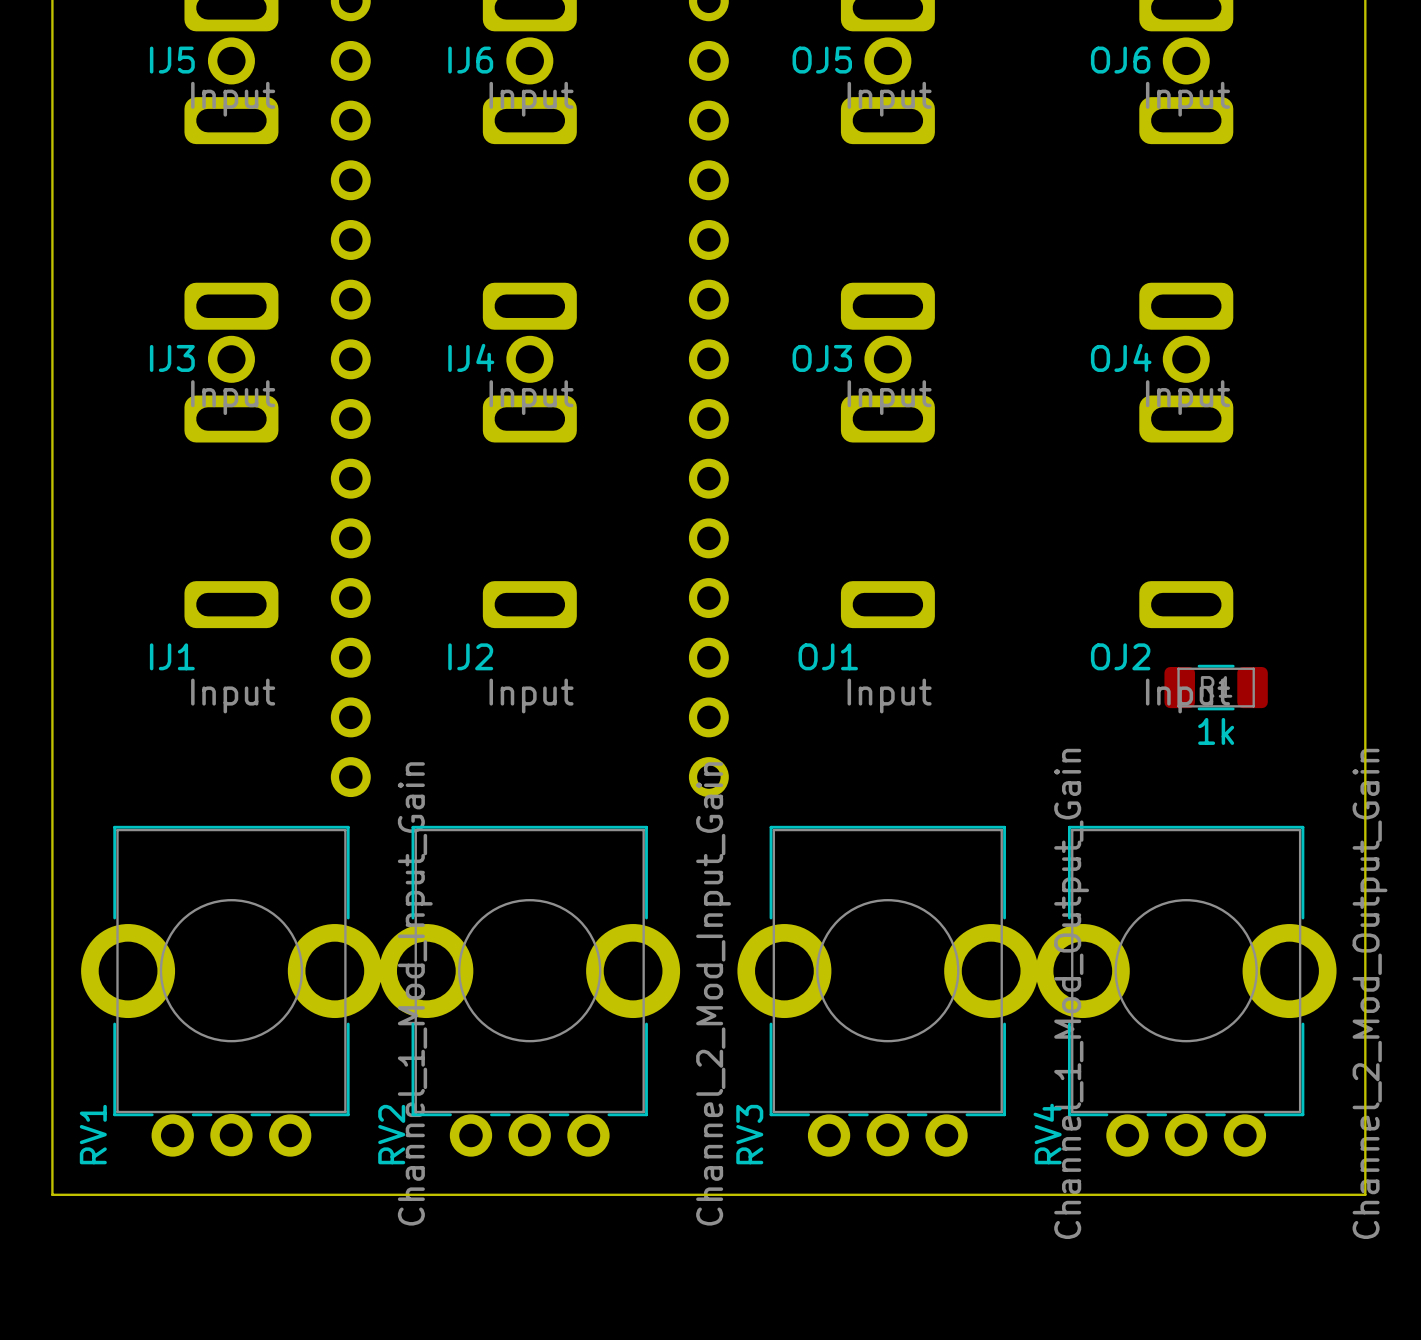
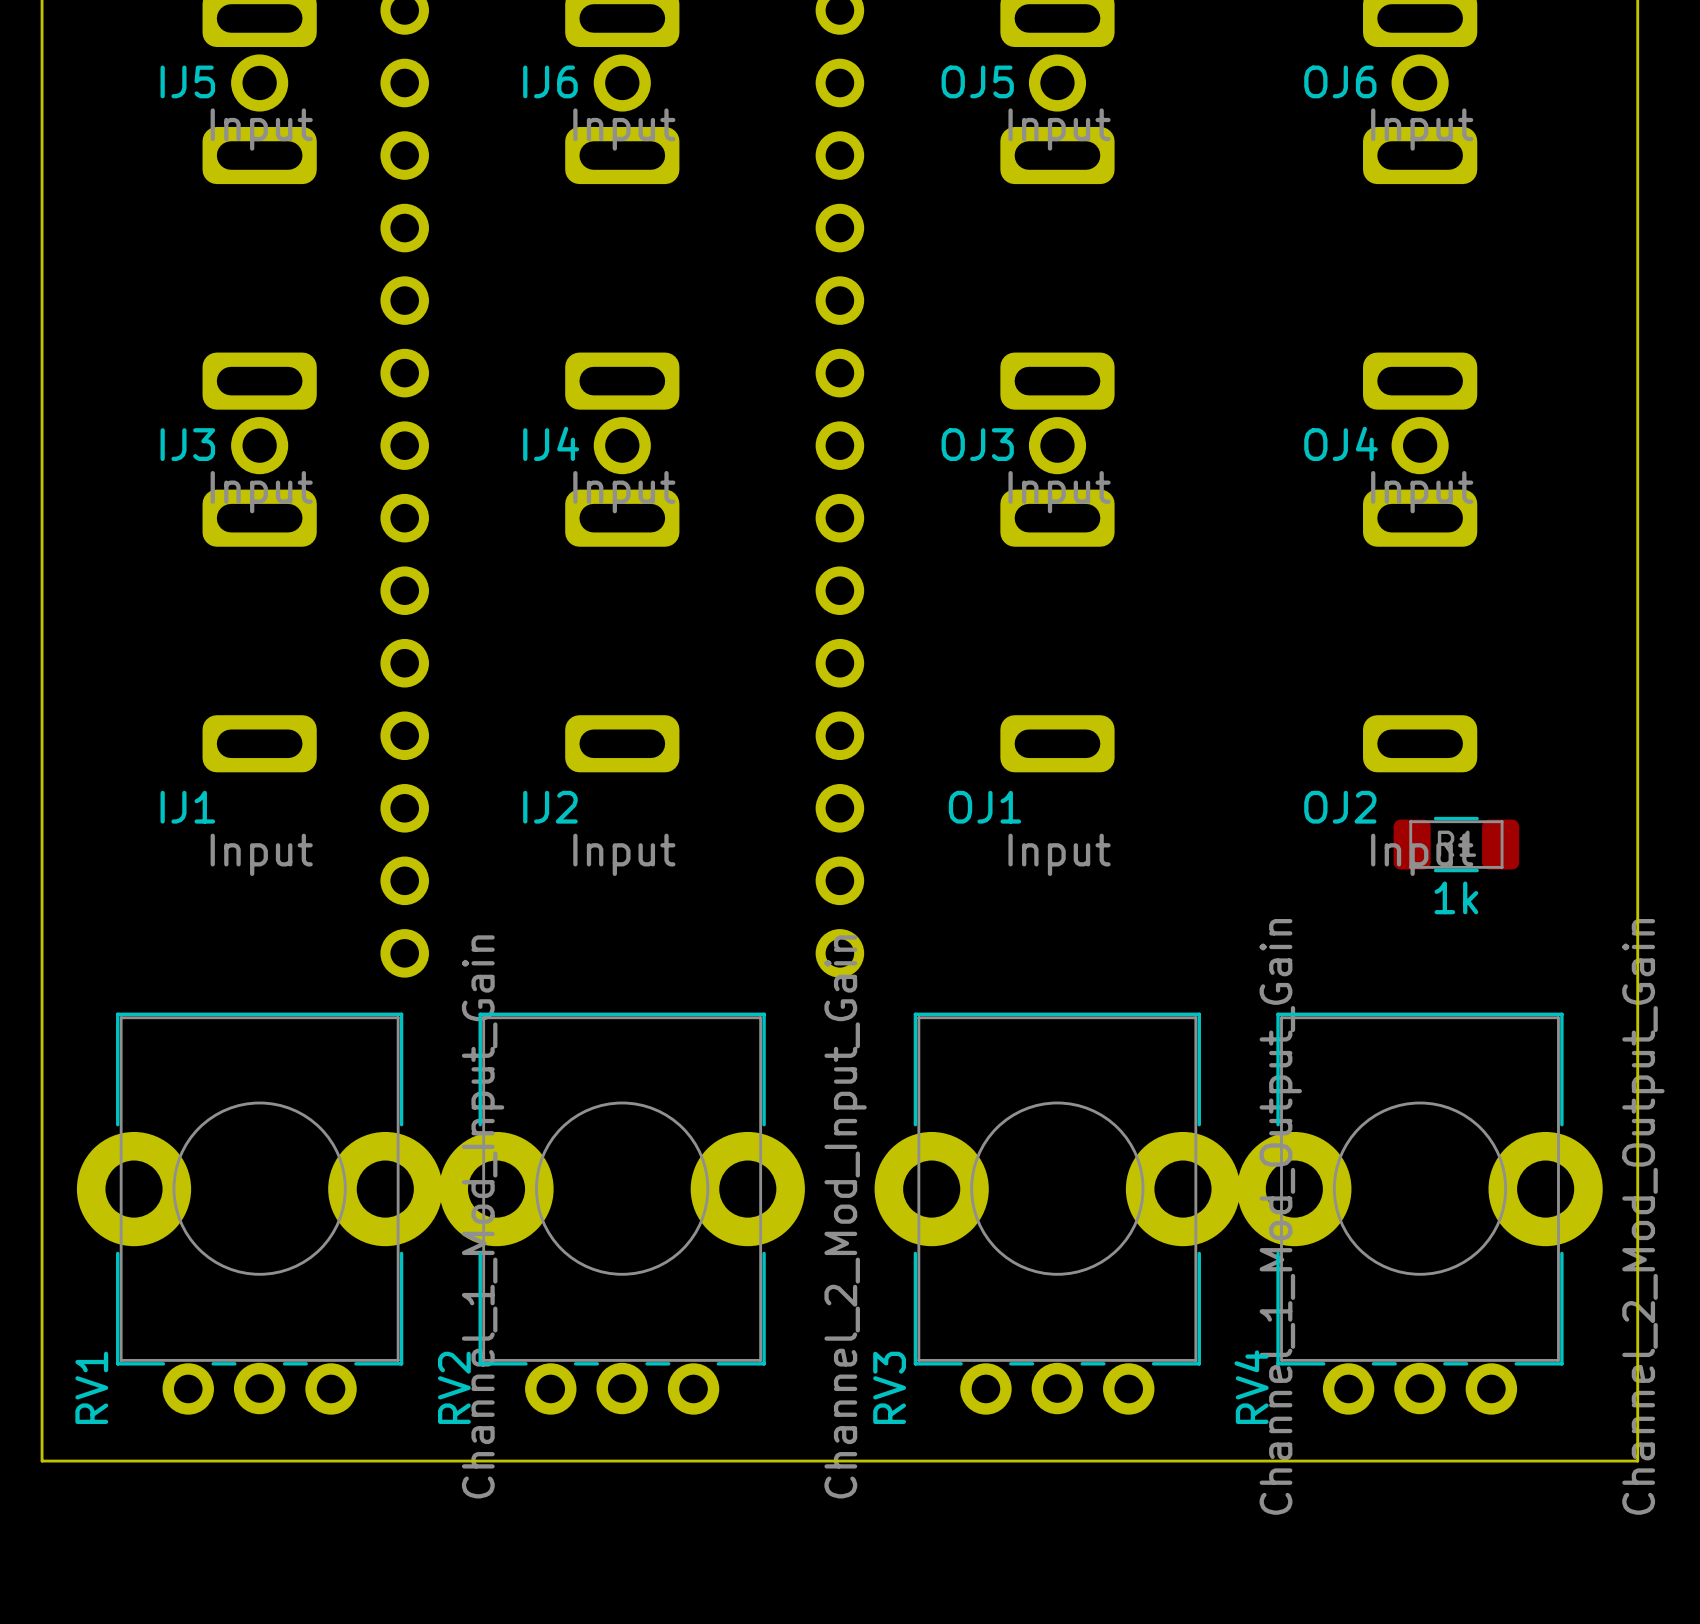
RV1 footprint: [81, 825, 382, 1157] -> [76, 1012, 443, 1415]
RV2 footprint: [379, 825, 681, 1157] -> [439, 1012, 805, 1415]
RV3 footprint: [737, 825, 1039, 1157] -> [874, 1012, 1241, 1415]
RV4 footprint: [1035, 825, 1337, 1157] -> [1237, 1012, 1603, 1415]

